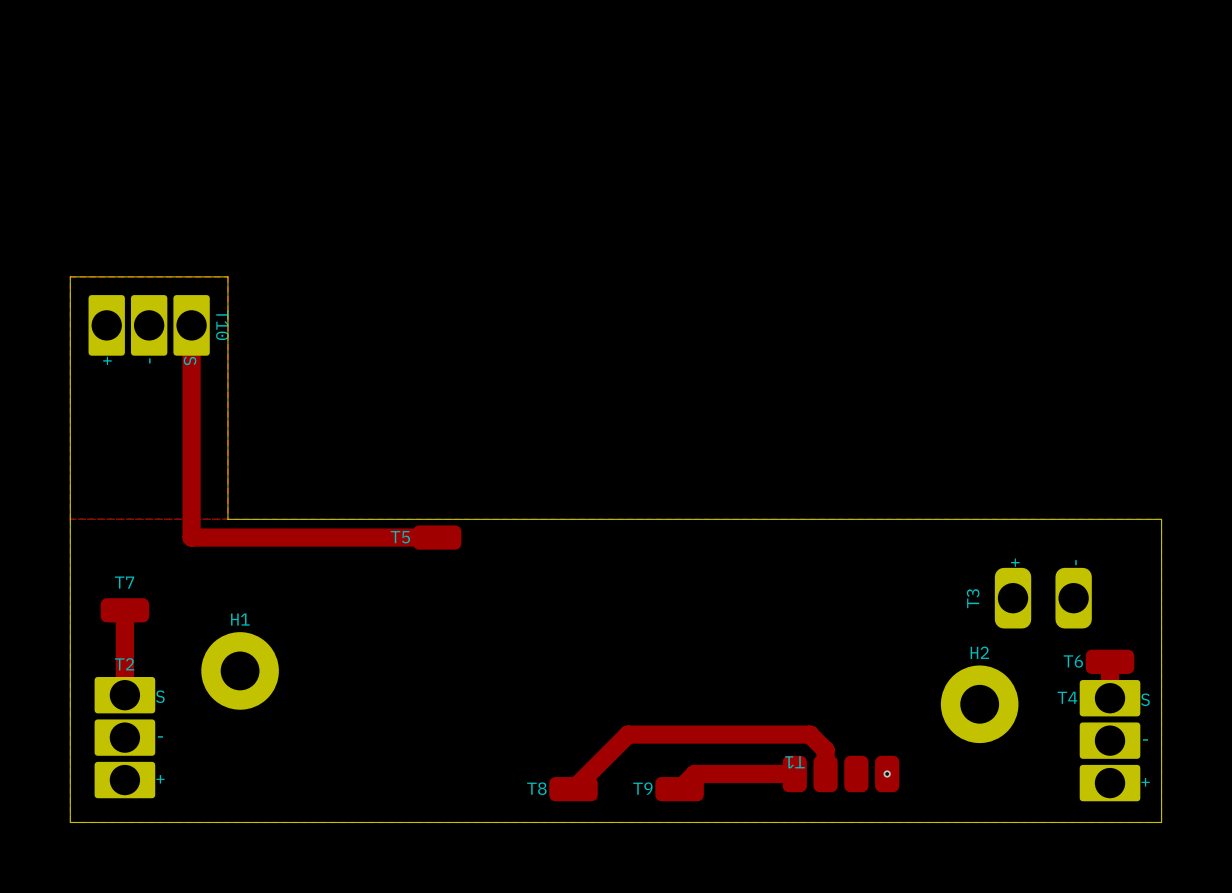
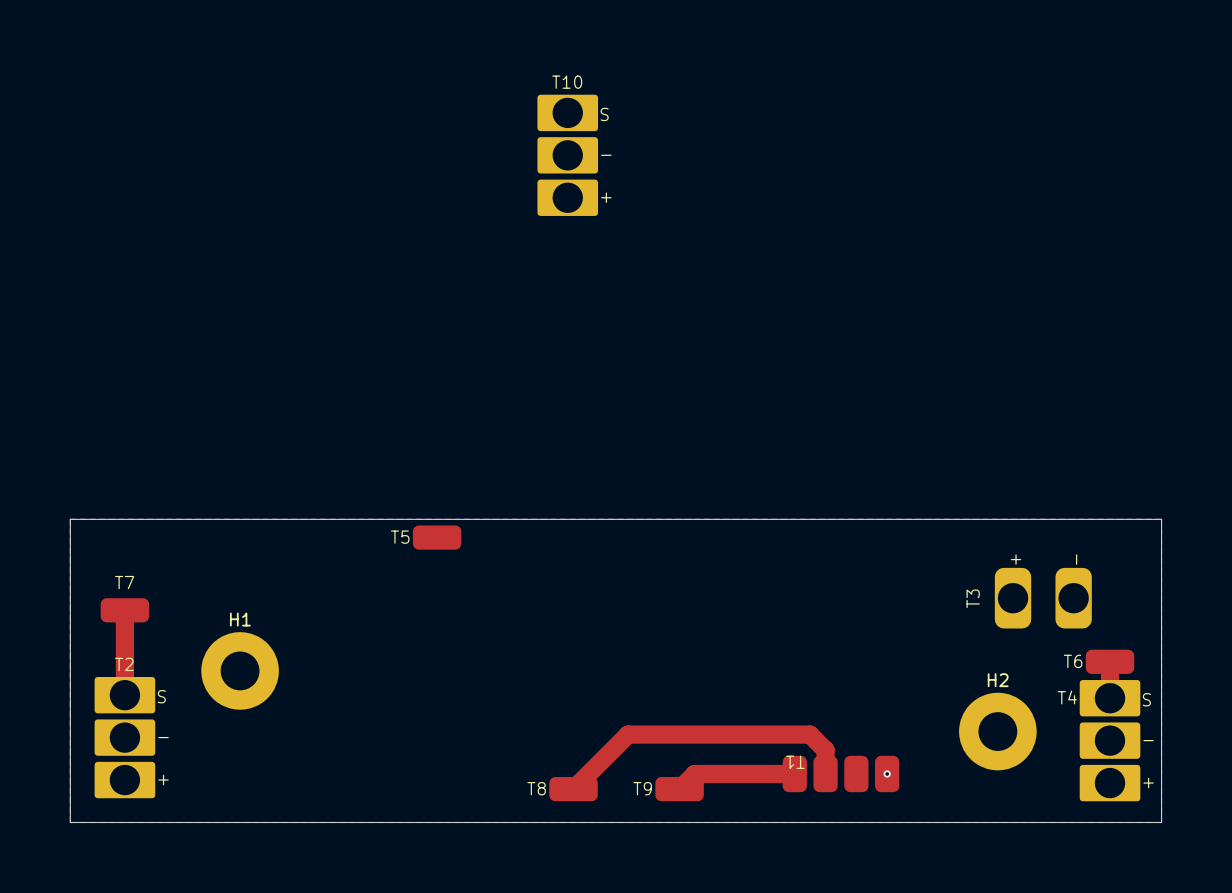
T10 rotation: 0° (149, 325) -> 90° counterclockwise (567, 155)
T10 position: (149, 325) -> (567, 155)
top track: (191, 325) (191, 537) (437, 537) -> none
board edge: (70, 519) (70, 276) (227, 276) (227, 519) -> (70, 519) (227, 519)
top zone outline: (70, 519) (70, 276) (227, 276) (227, 519) -> none
H2 position: (979, 704) -> (997, 731)

